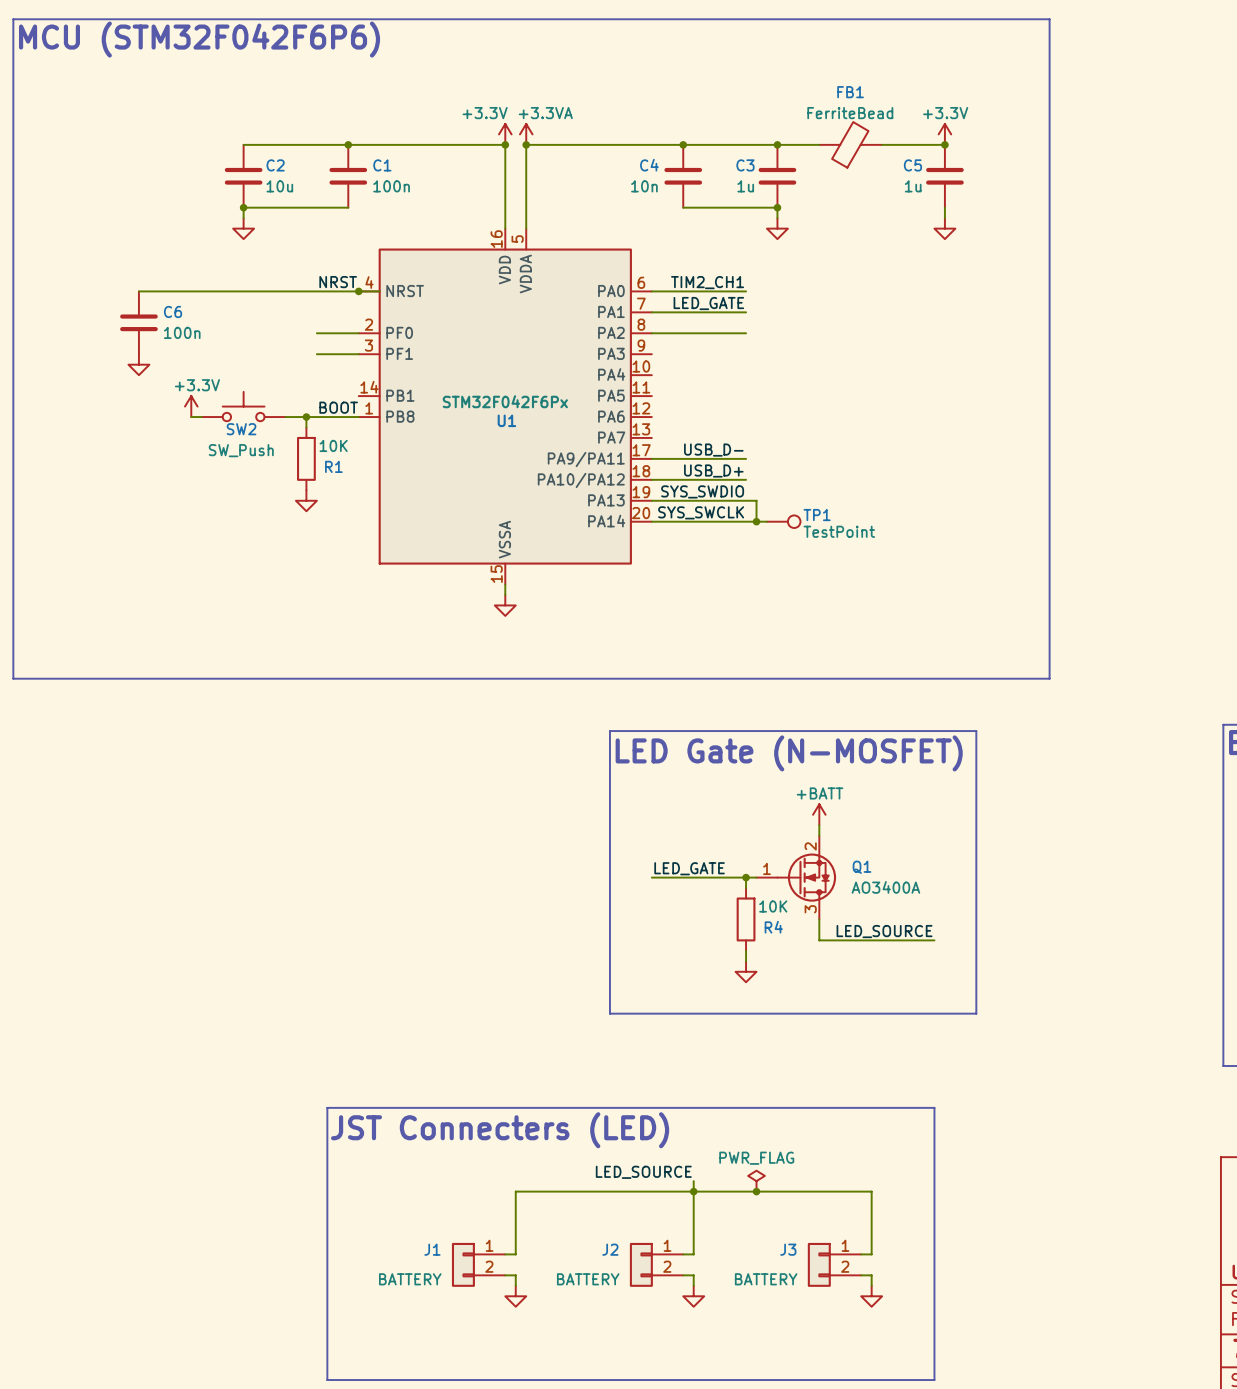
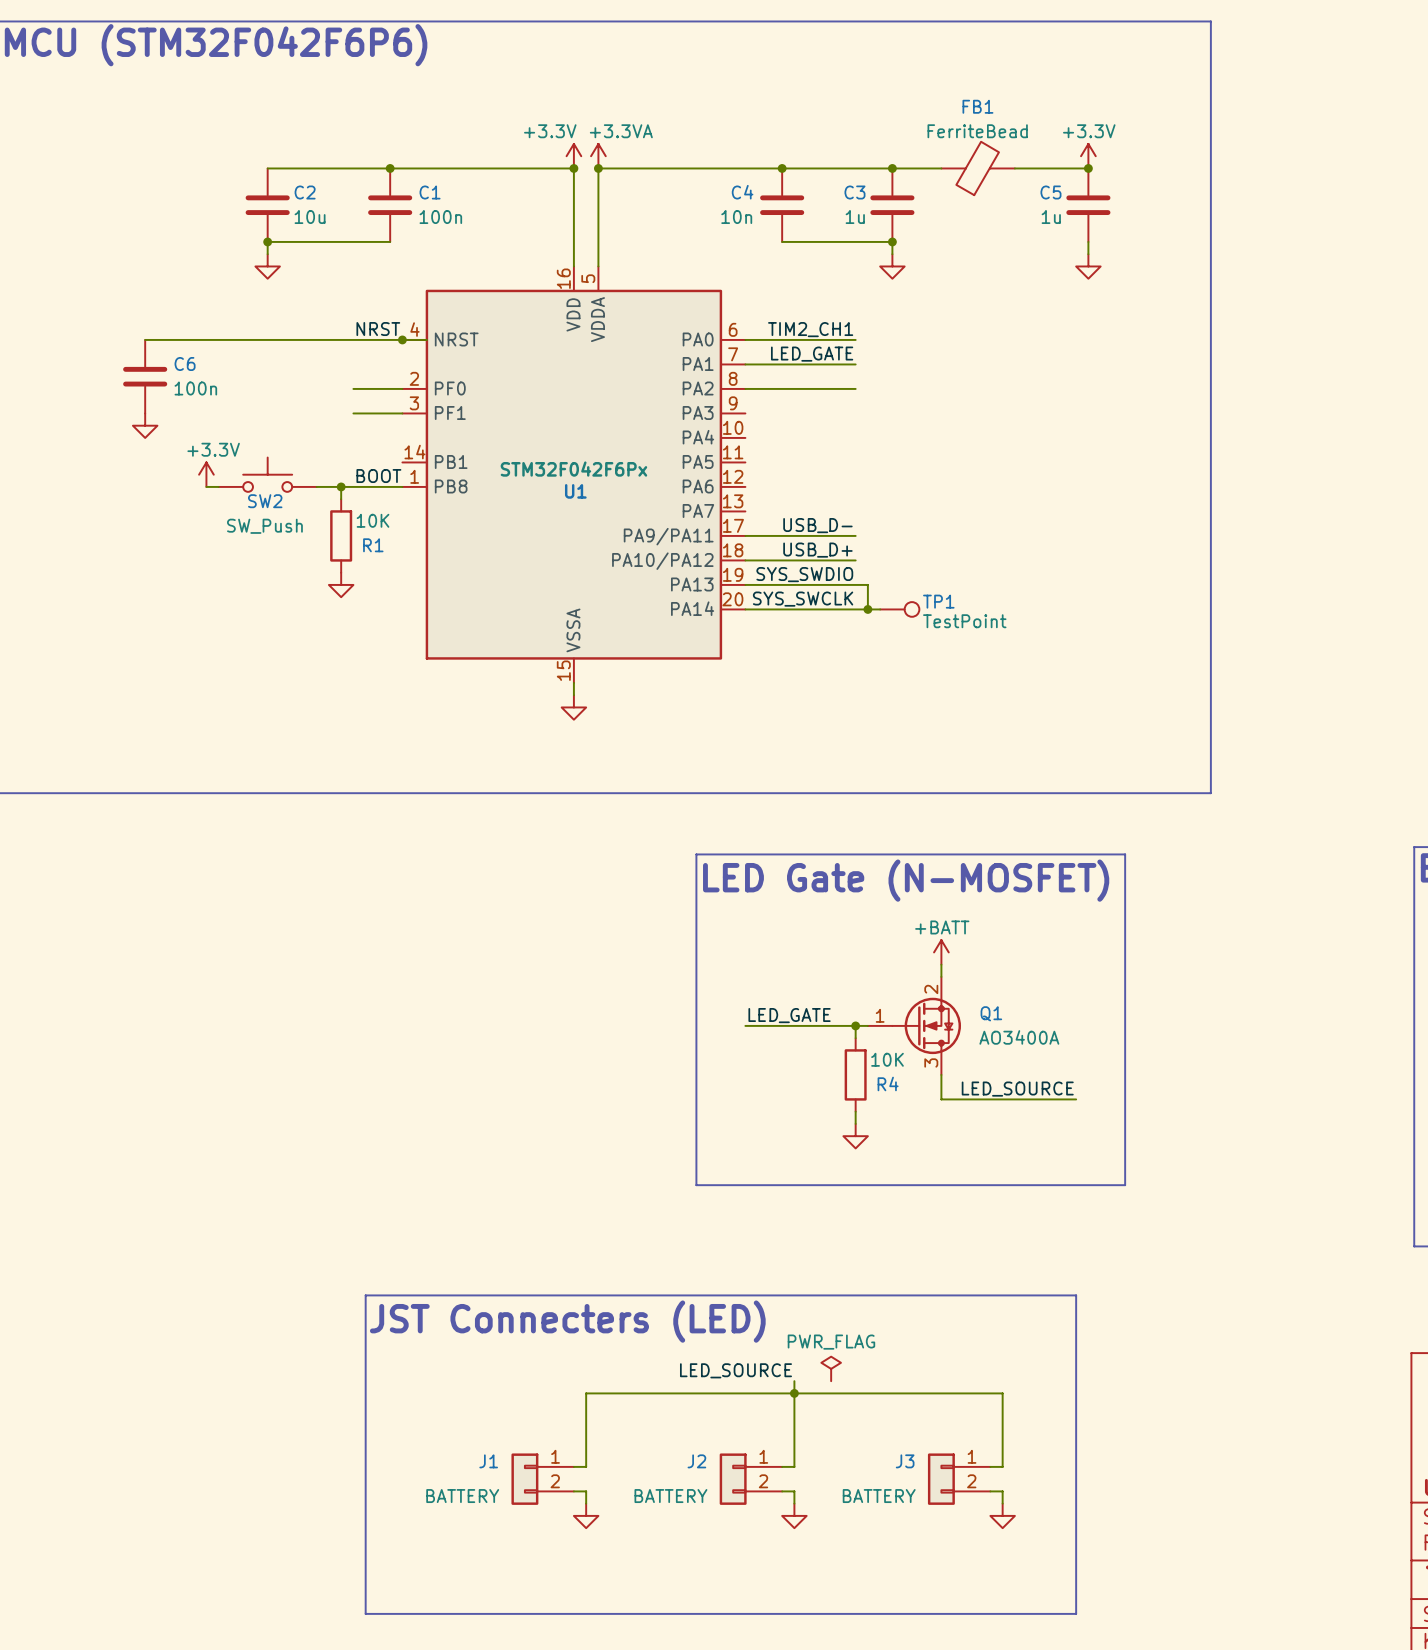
power symbol position: PWR_FLAG (756, 1181) -> PWR_FLAG (831, 1368)
junction: (756, 1191) -> none

